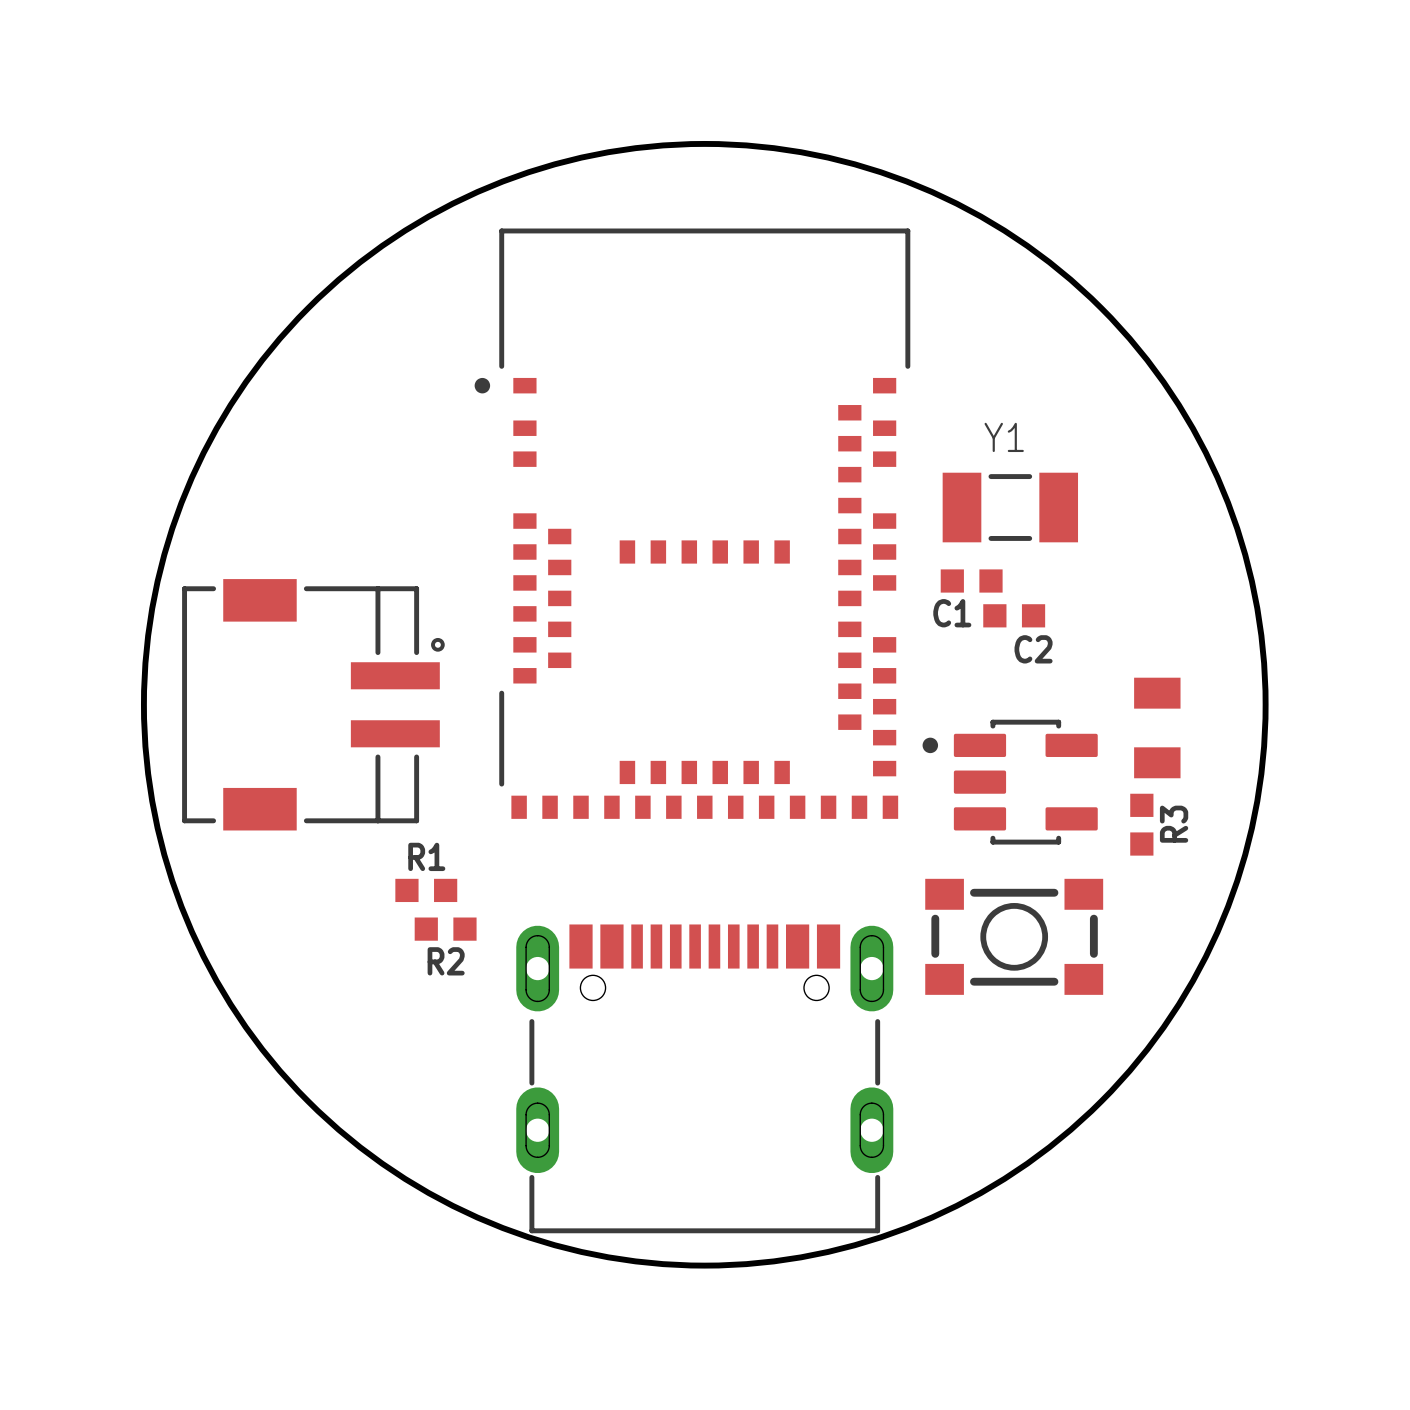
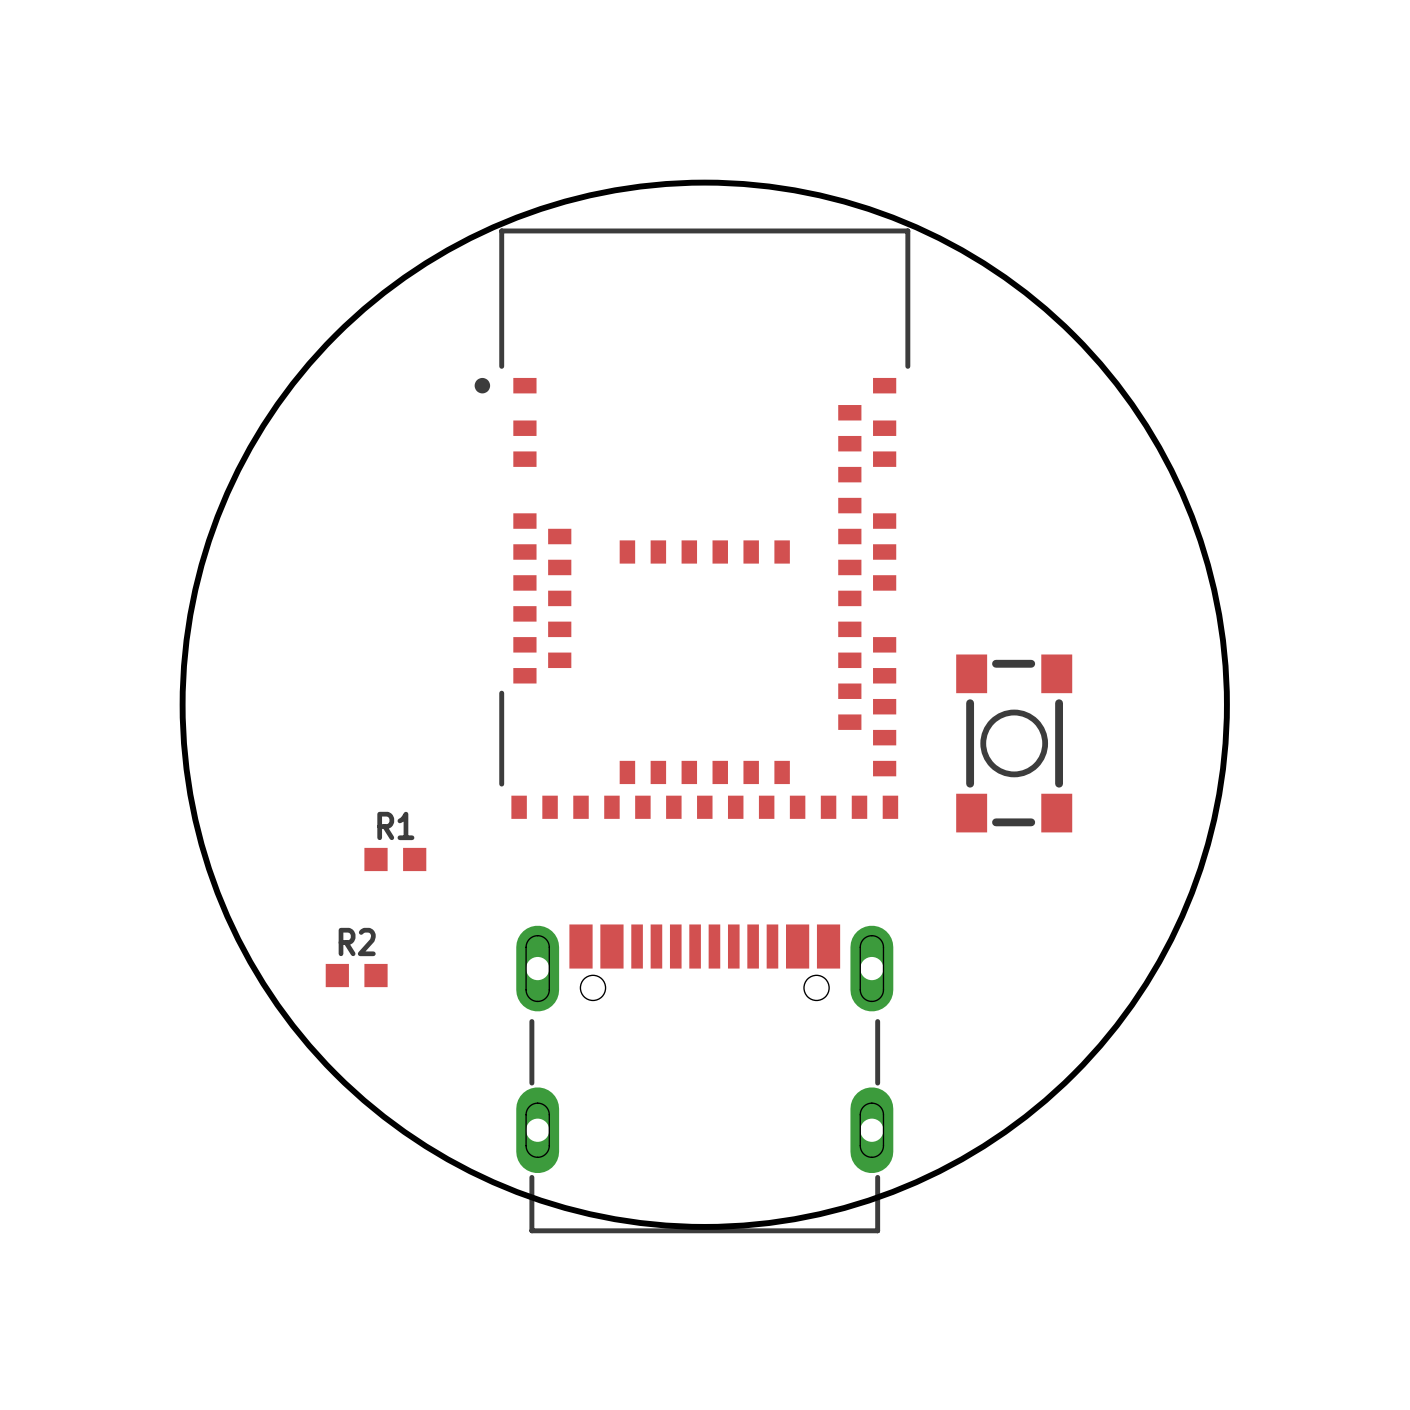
round board edge size: [140, 140, 1269, 1269] -> [179, 179, 1230, 1230]
Y1: (1010, 507) -> none
C1: (971, 581) -> none
C2: (1014, 615) -> none
part: (313, 704) -> none
part: (1157, 727) -> none
part: (1010, 782) -> none
R3: (1141, 824) -> none
R1 position: (426, 890) -> (395, 859)
R2 position: (445, 929) -> (356, 975)
part rotation: 0° (1014, 936) -> 90° counterclockwise (1014, 743)
part position: (1014, 936) -> (1014, 743)
R2 name position: R2 (446, 961) -> R2 (357, 942)

